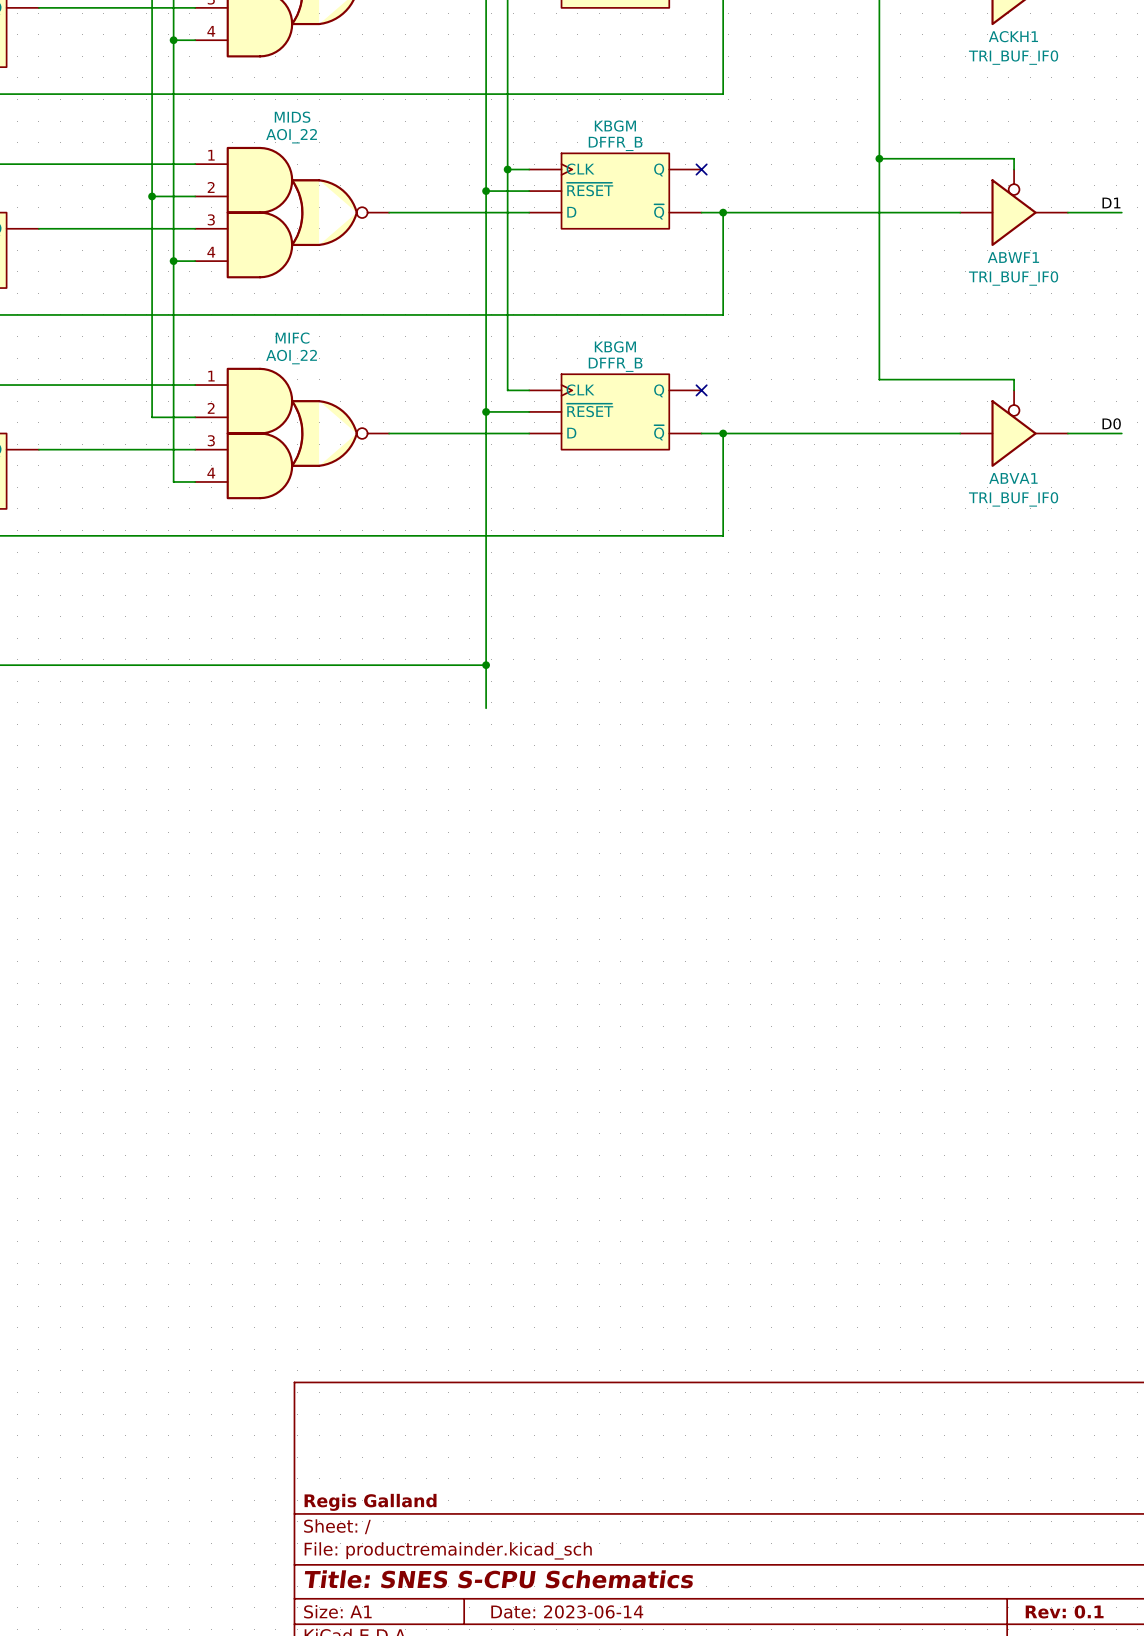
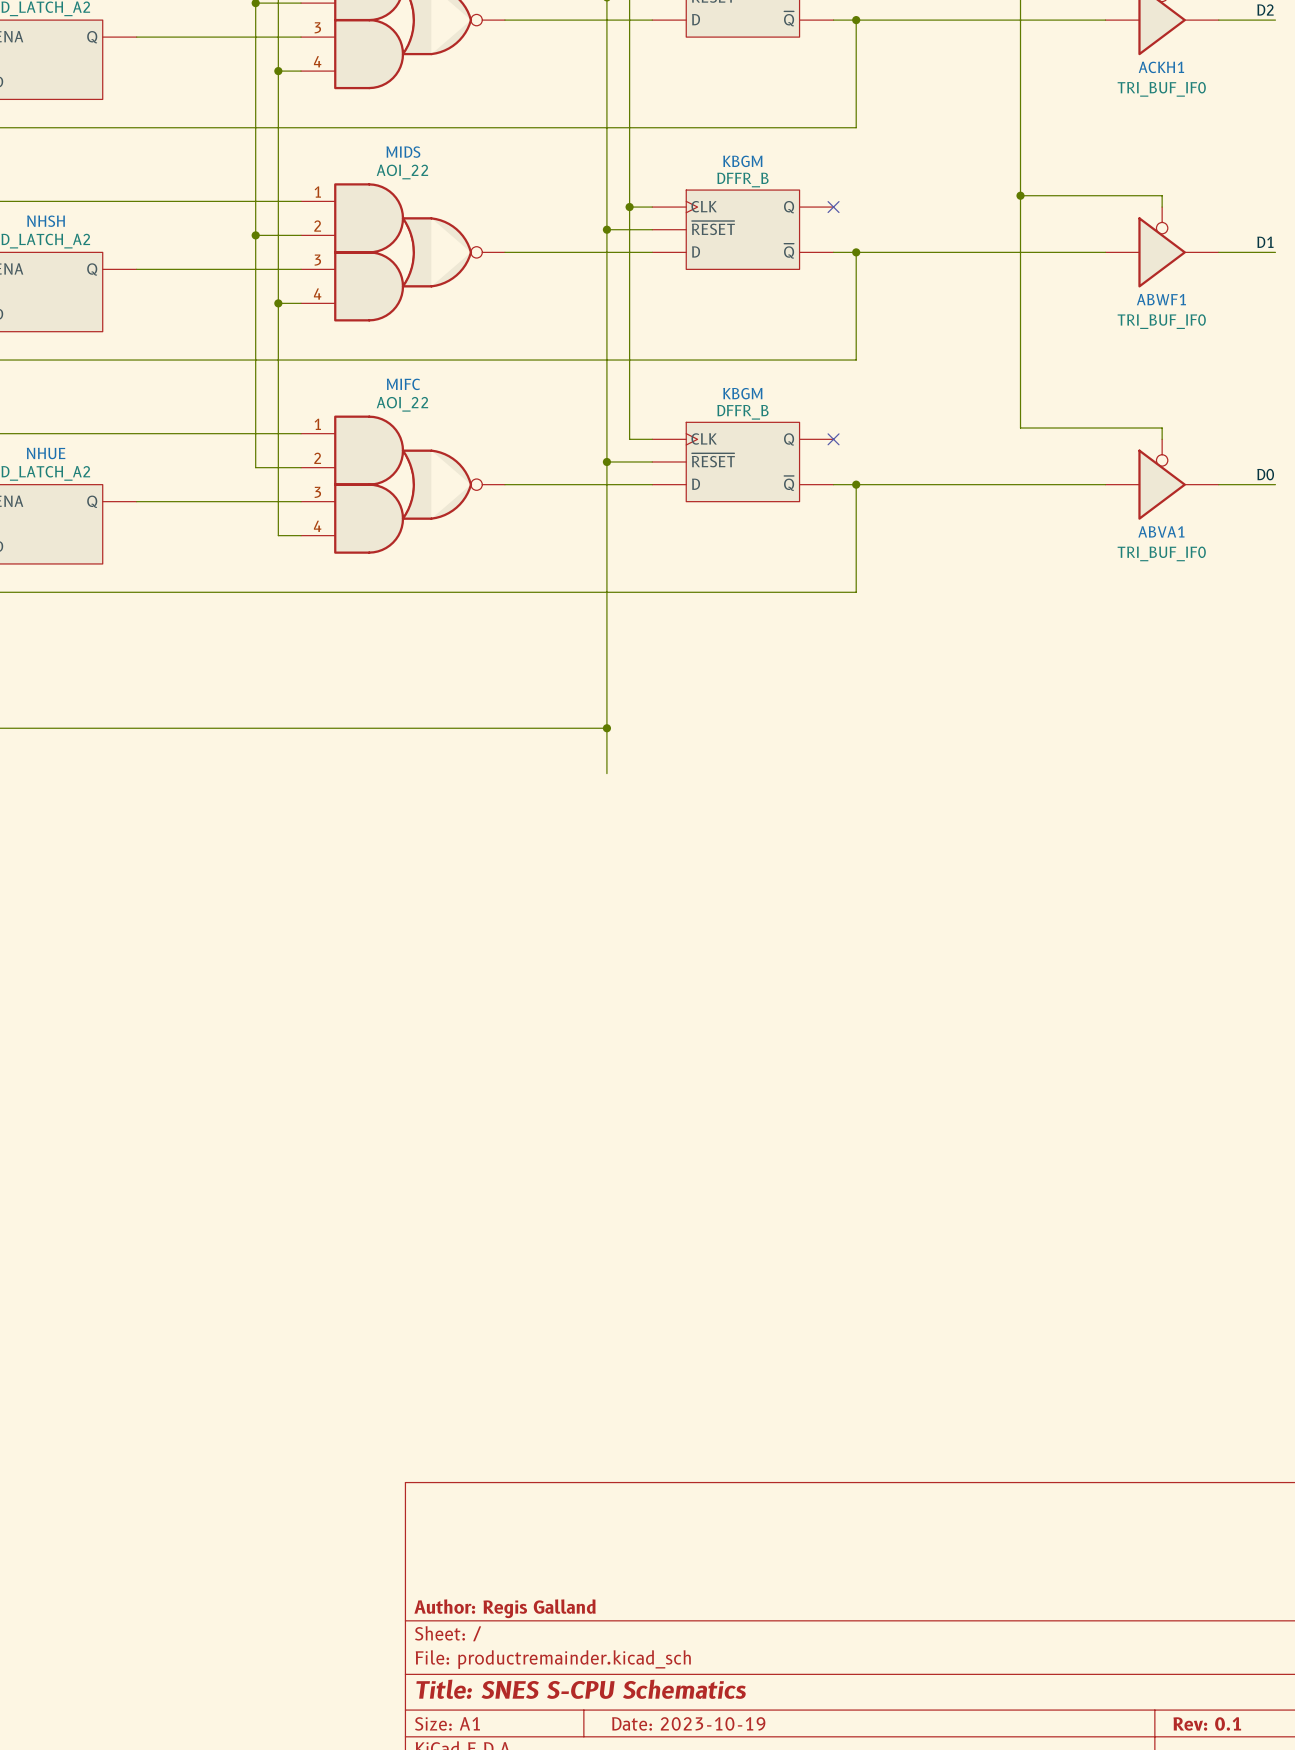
title block: Regis Galland (370, 1502) -> Author: Regis Galland (505, 1608)
title block: Date: 2023-06-14 (567, 1611) -> Date: 2023-10-19 (688, 1723)

